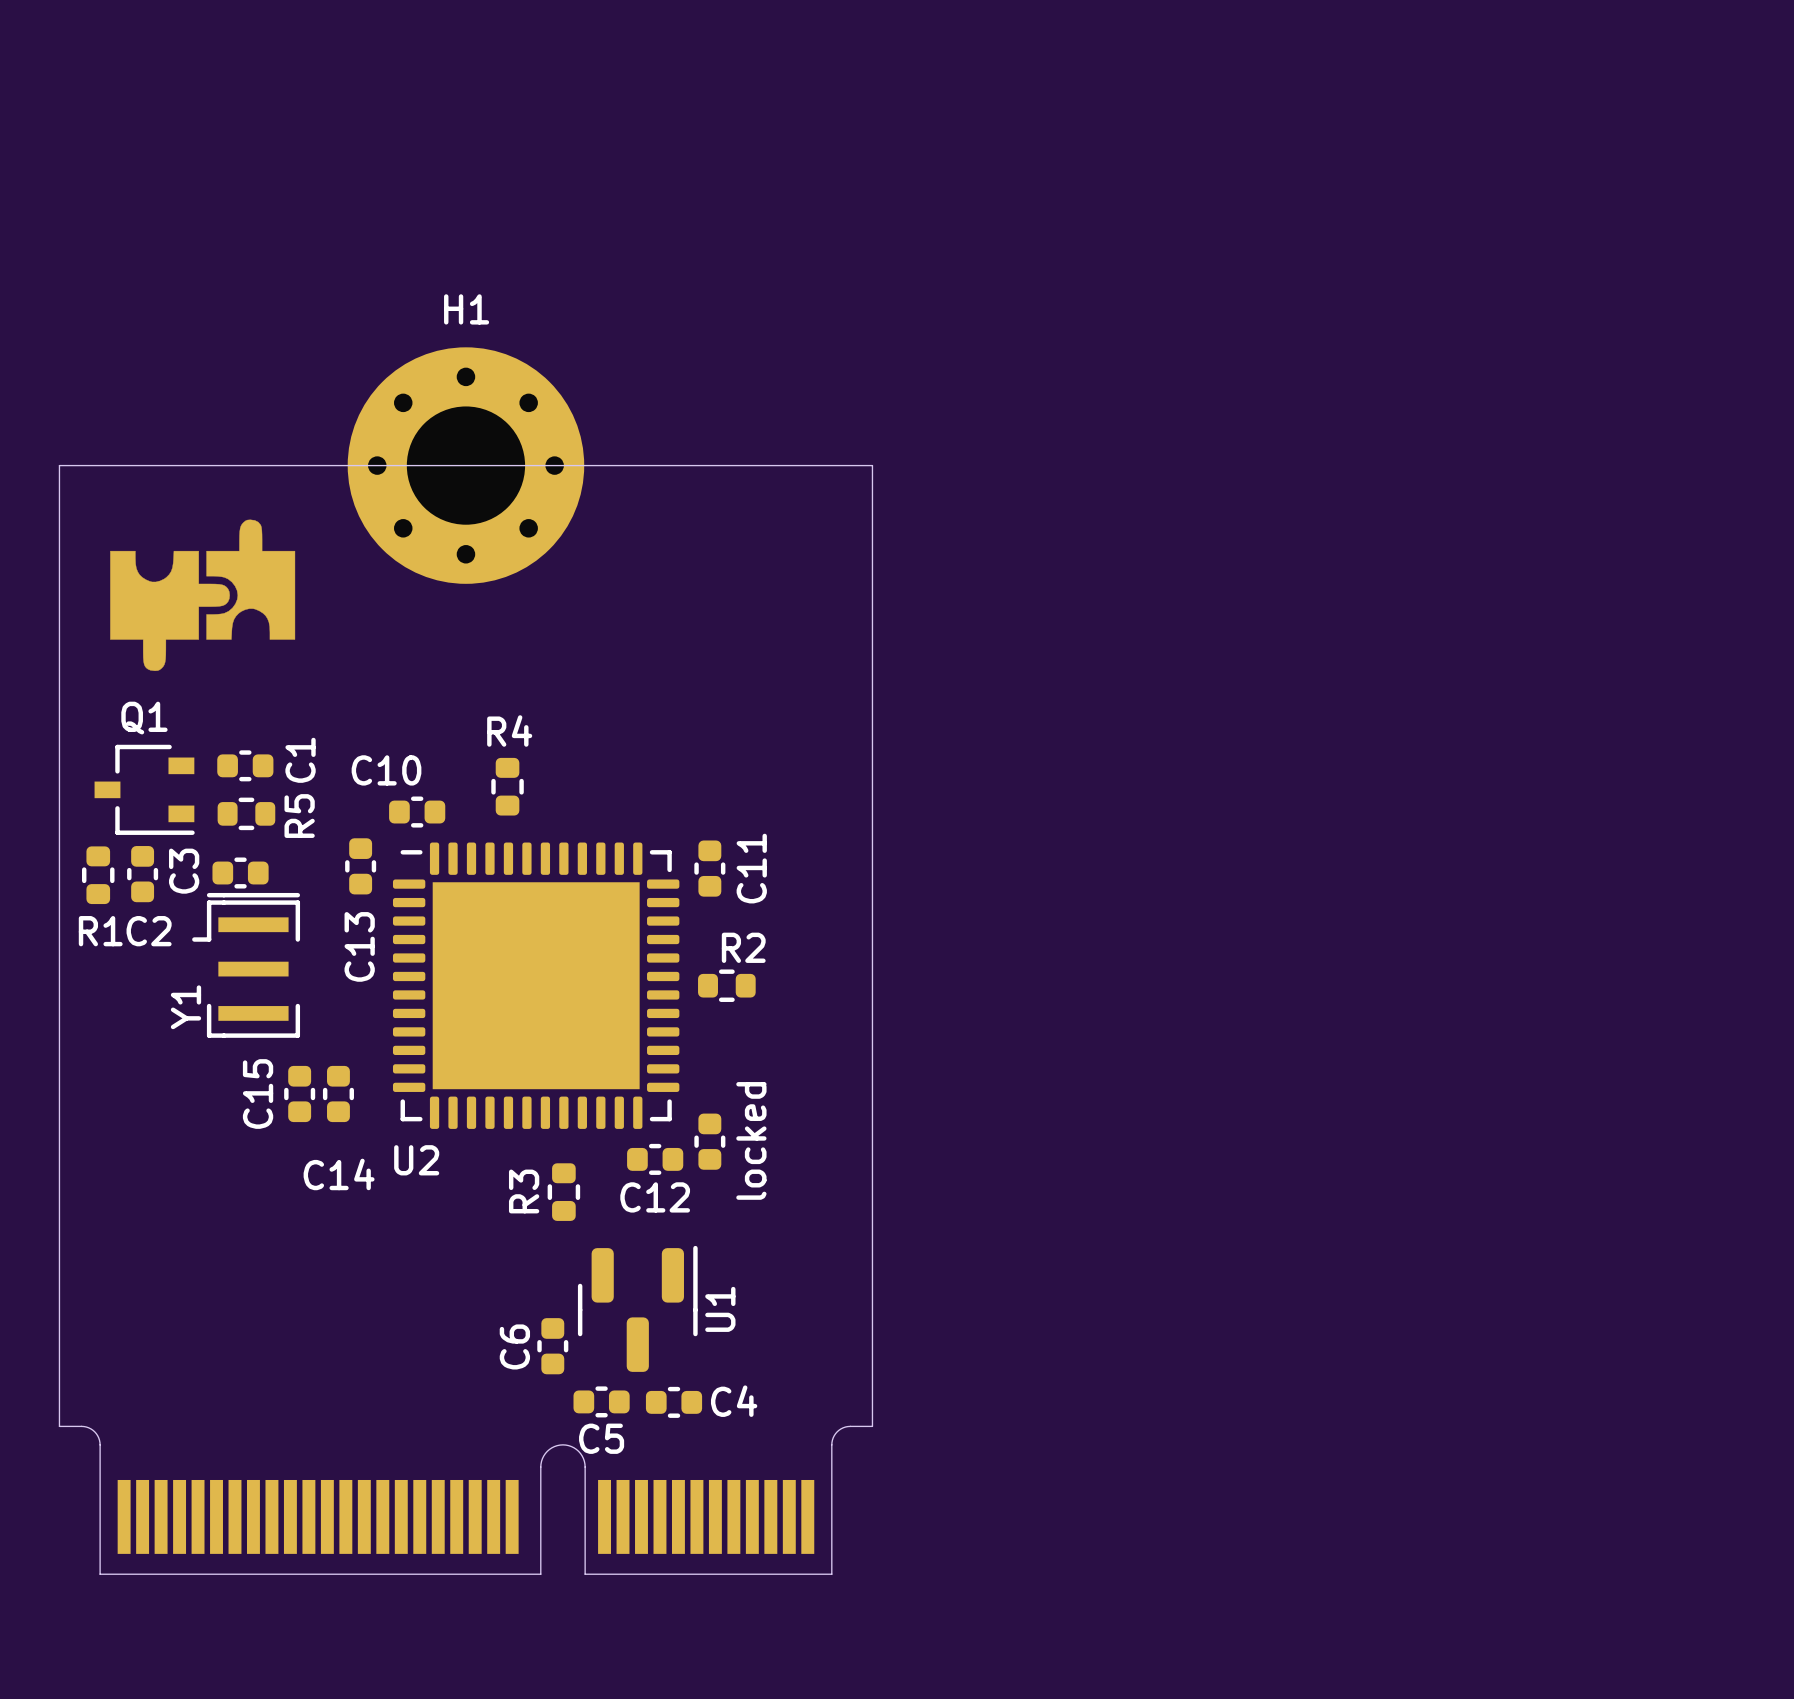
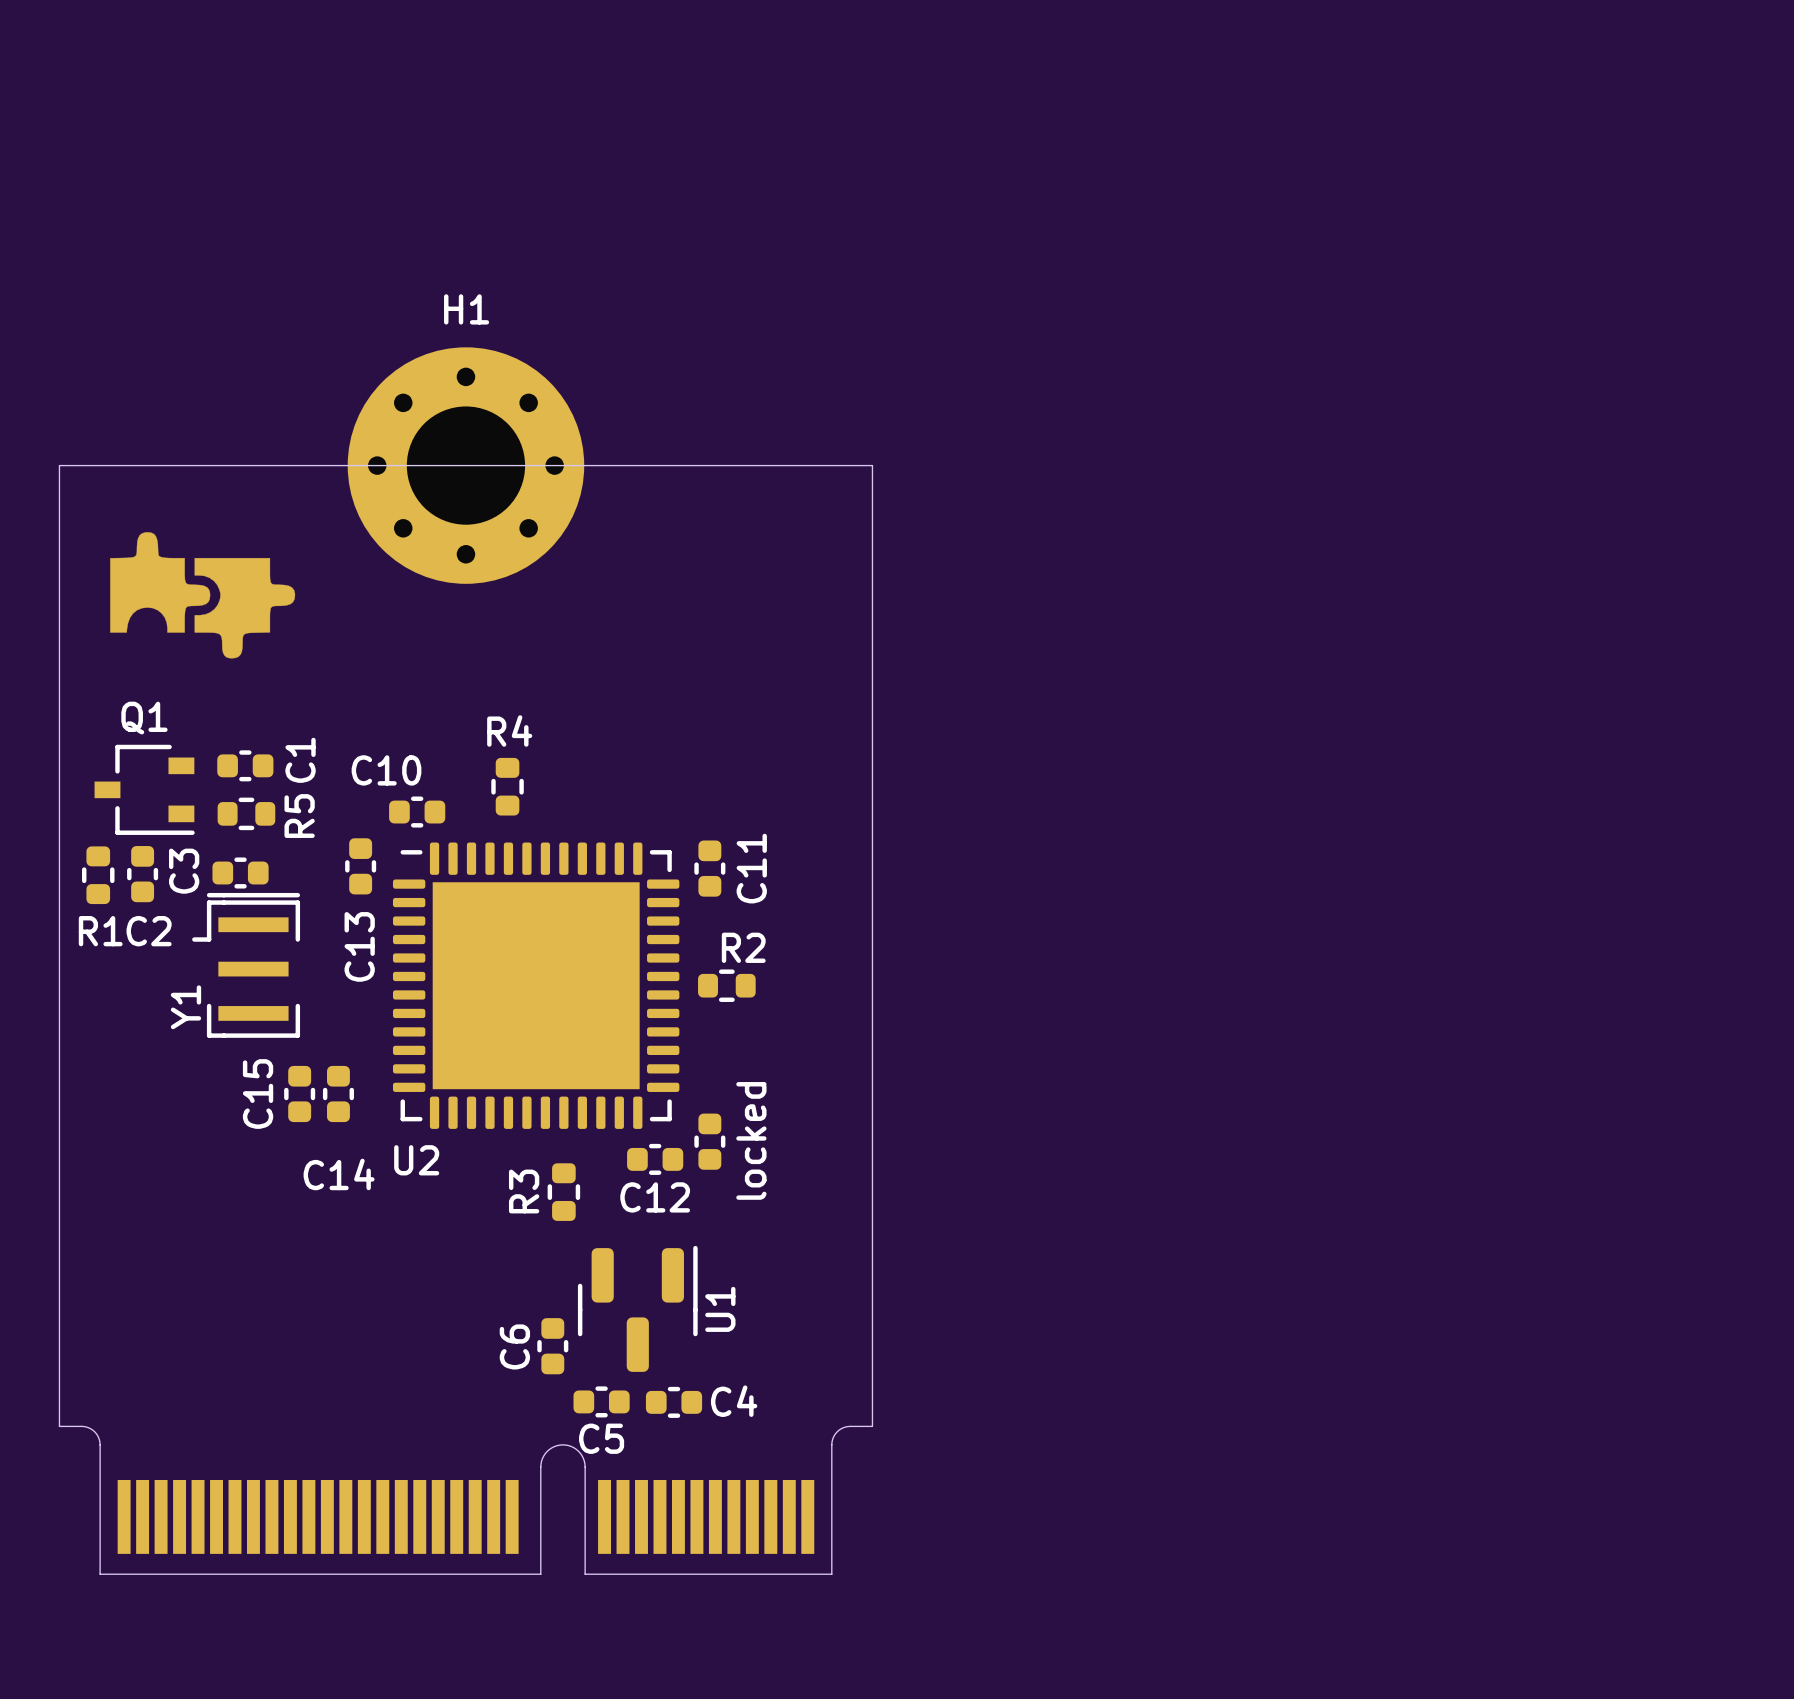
part footprint: [110, 519, 296, 671] -> [110, 532, 296, 659]

